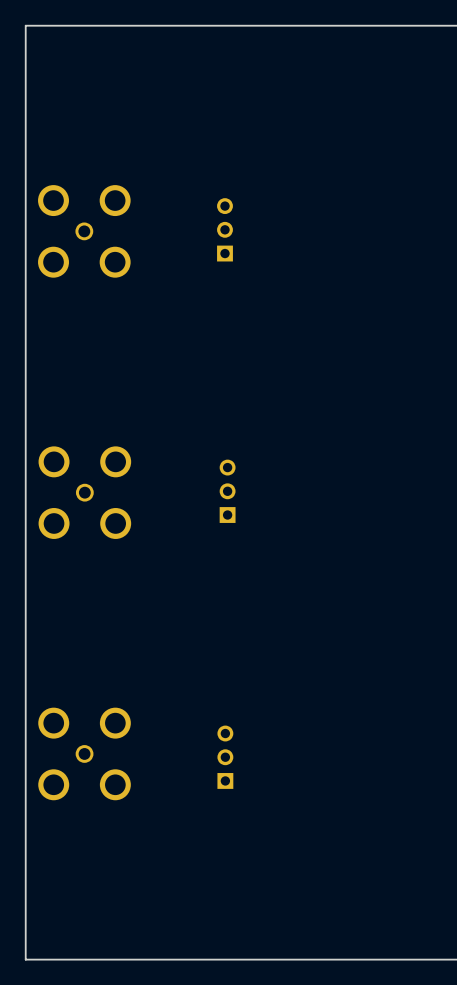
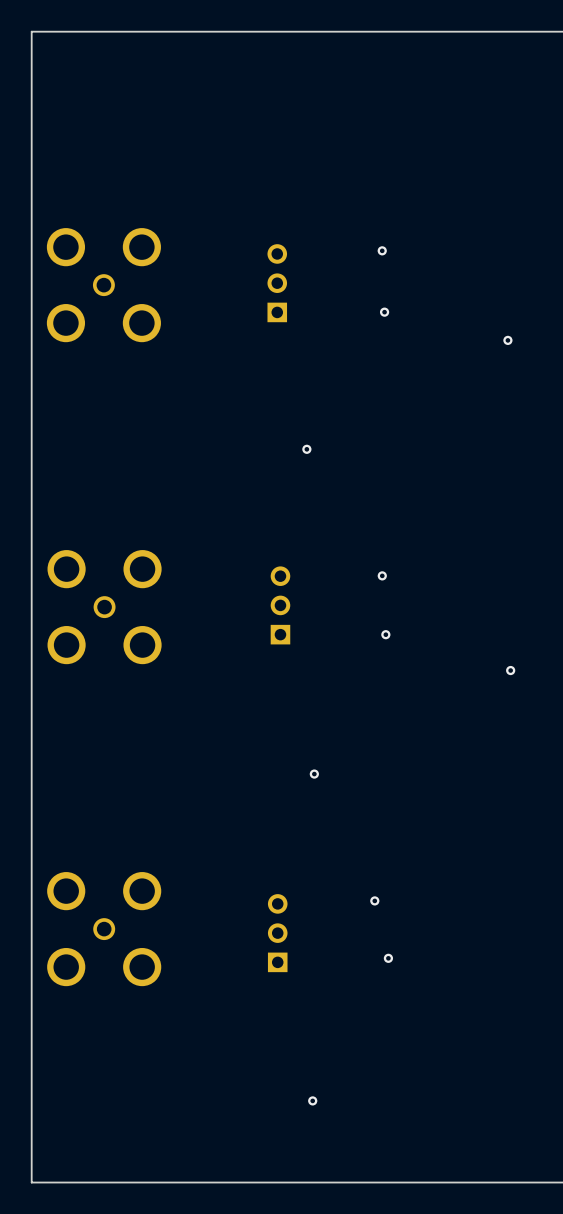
via: none -> (382, 250)
via: none -> (384, 312)
via: none -> (507, 340)
via: none -> (306, 449)
via: none -> (382, 575)
via: none -> (385, 634)
via: none -> (510, 670)
via: none -> (314, 774)
via: none -> (374, 900)
via: none -> (388, 958)
via: none -> (312, 1100)

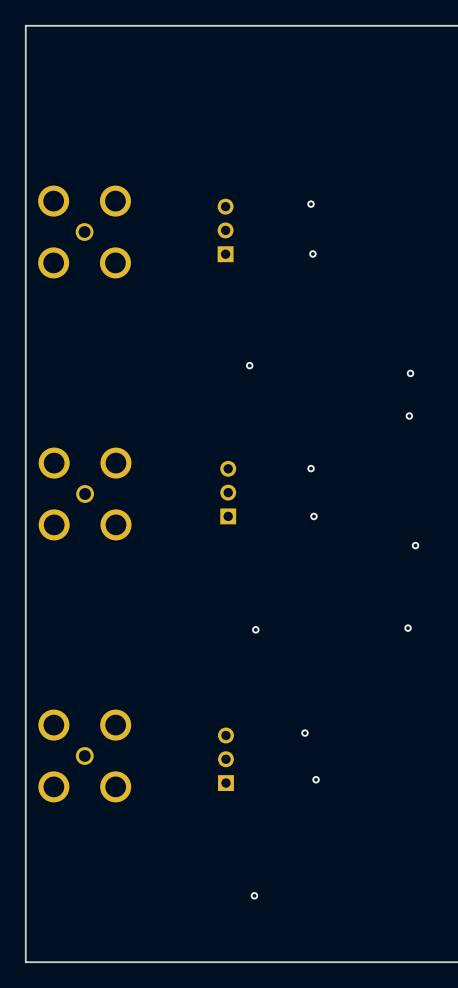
via: (507, 340) -> none
via: none -> (410, 373)
via: none -> (409, 416)
via: none -> (408, 628)

